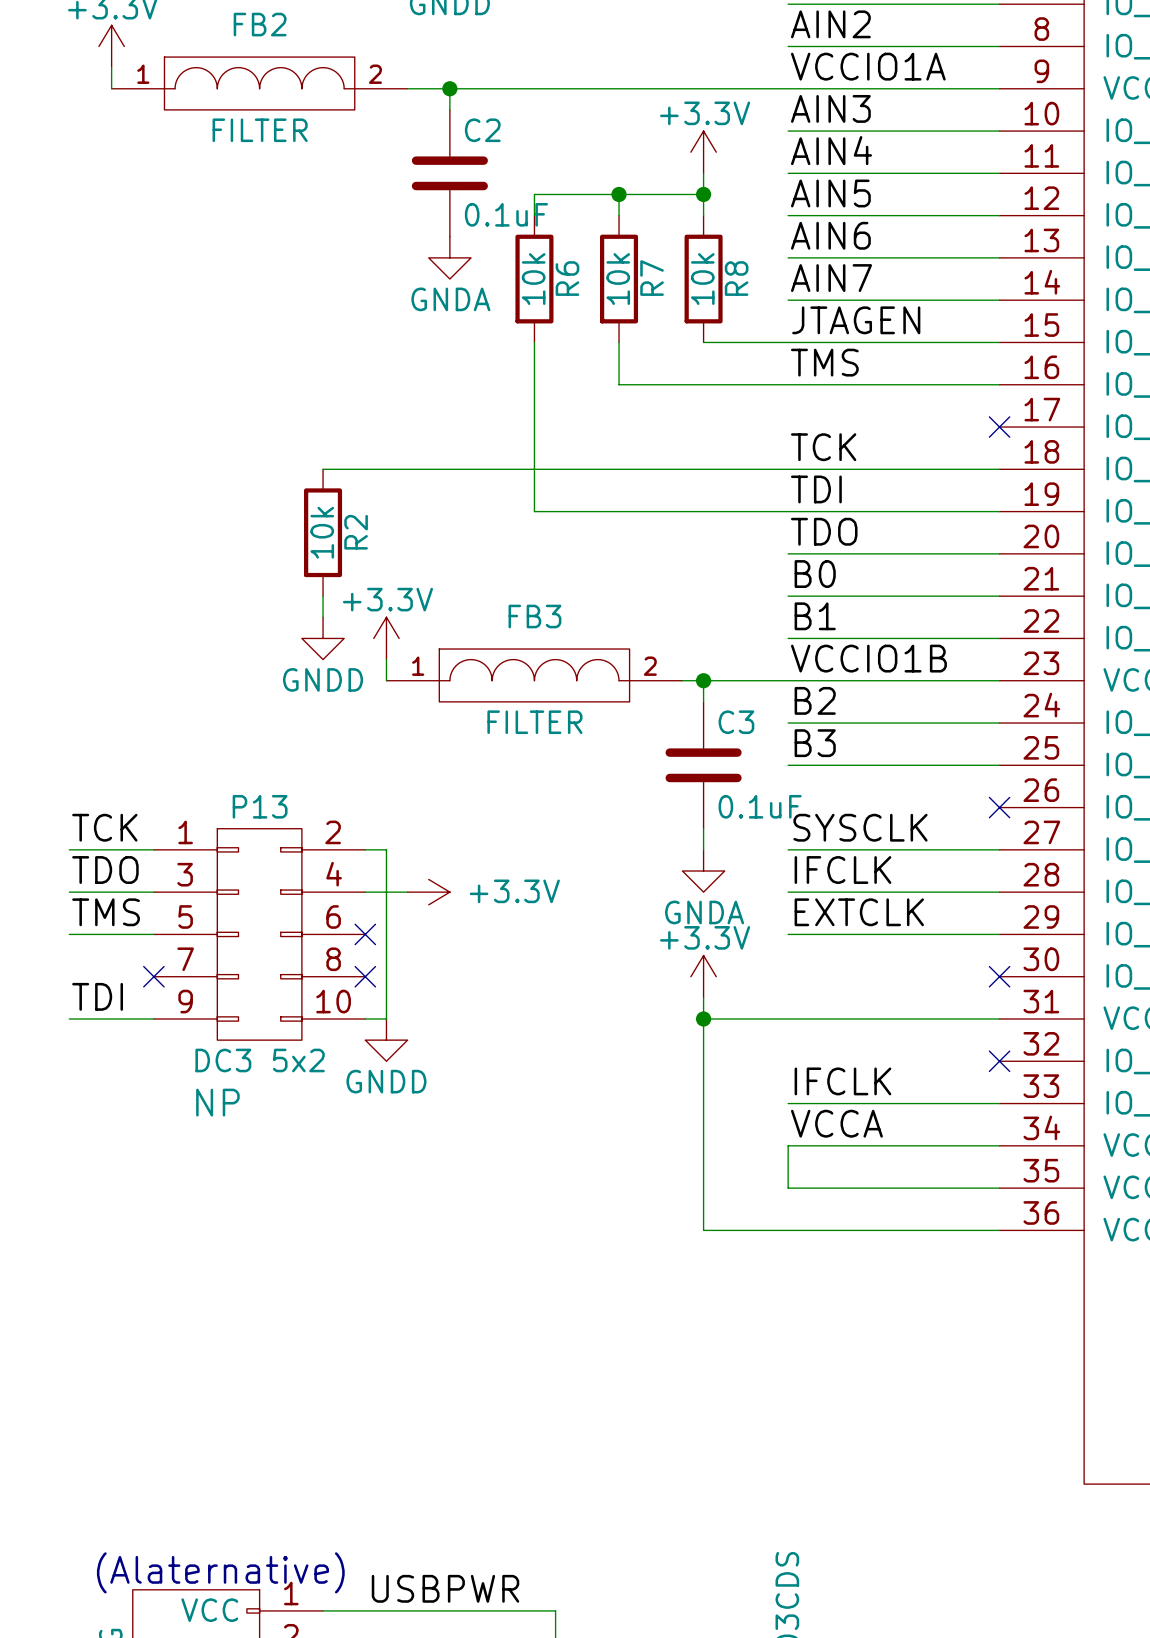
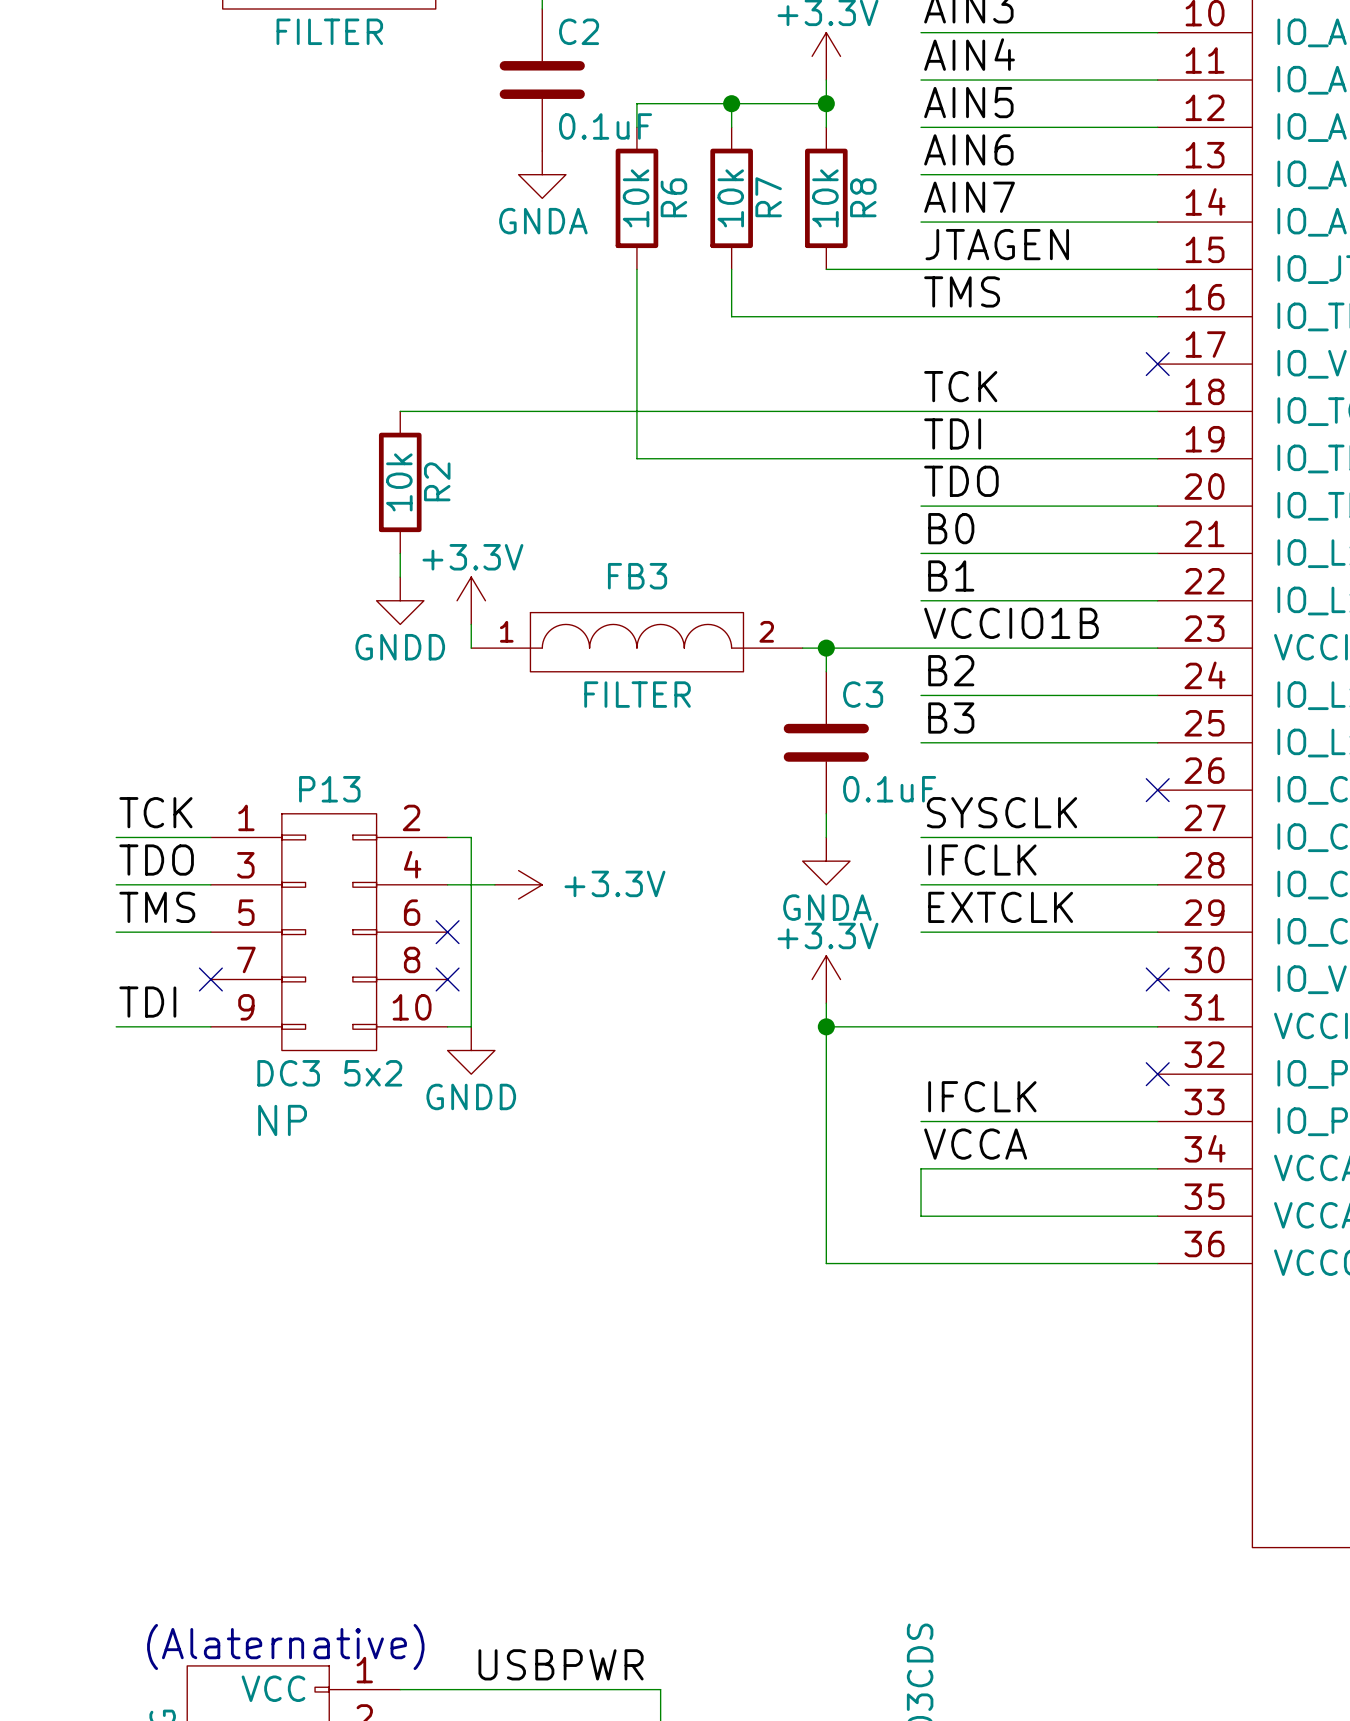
label position: USBPWR (445, 1588) -> USBPWR (561, 1664)

